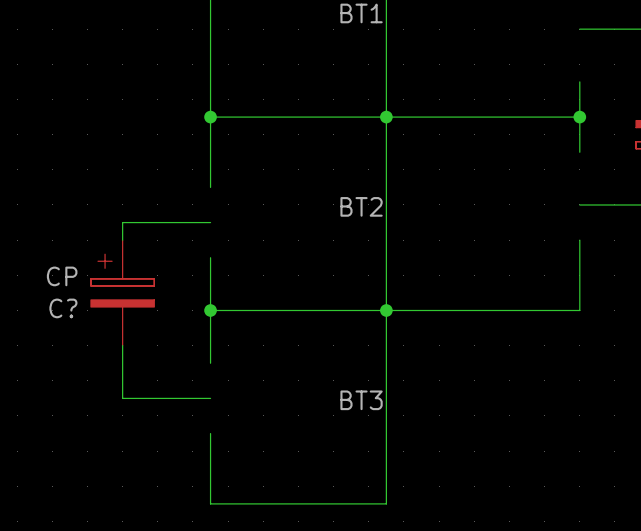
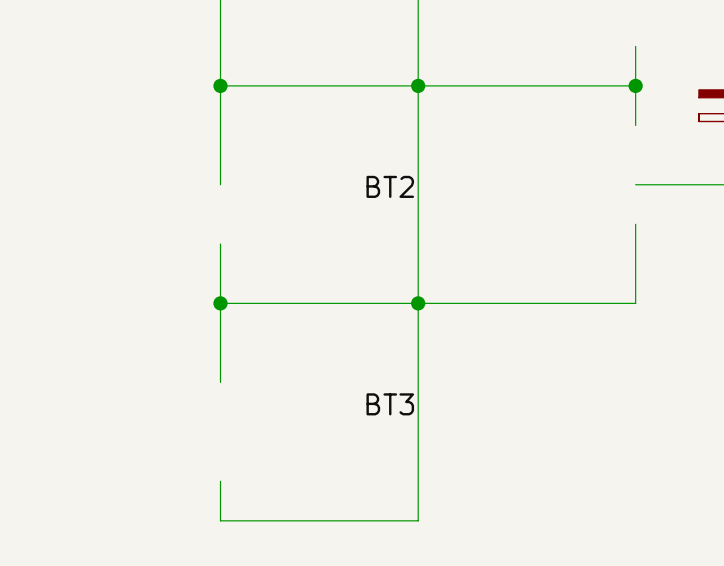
wire: none -> (220, 164) (220, 184)
wire: (210, 222) (122, 222) (122, 240) -> none
C?: CP (122, 292) -> none
wire: (122, 345) (122, 398) (210, 398) -> none
wire: none -> (220, 362) (220, 382)
wire: (210, 433) (210, 468) -> none

